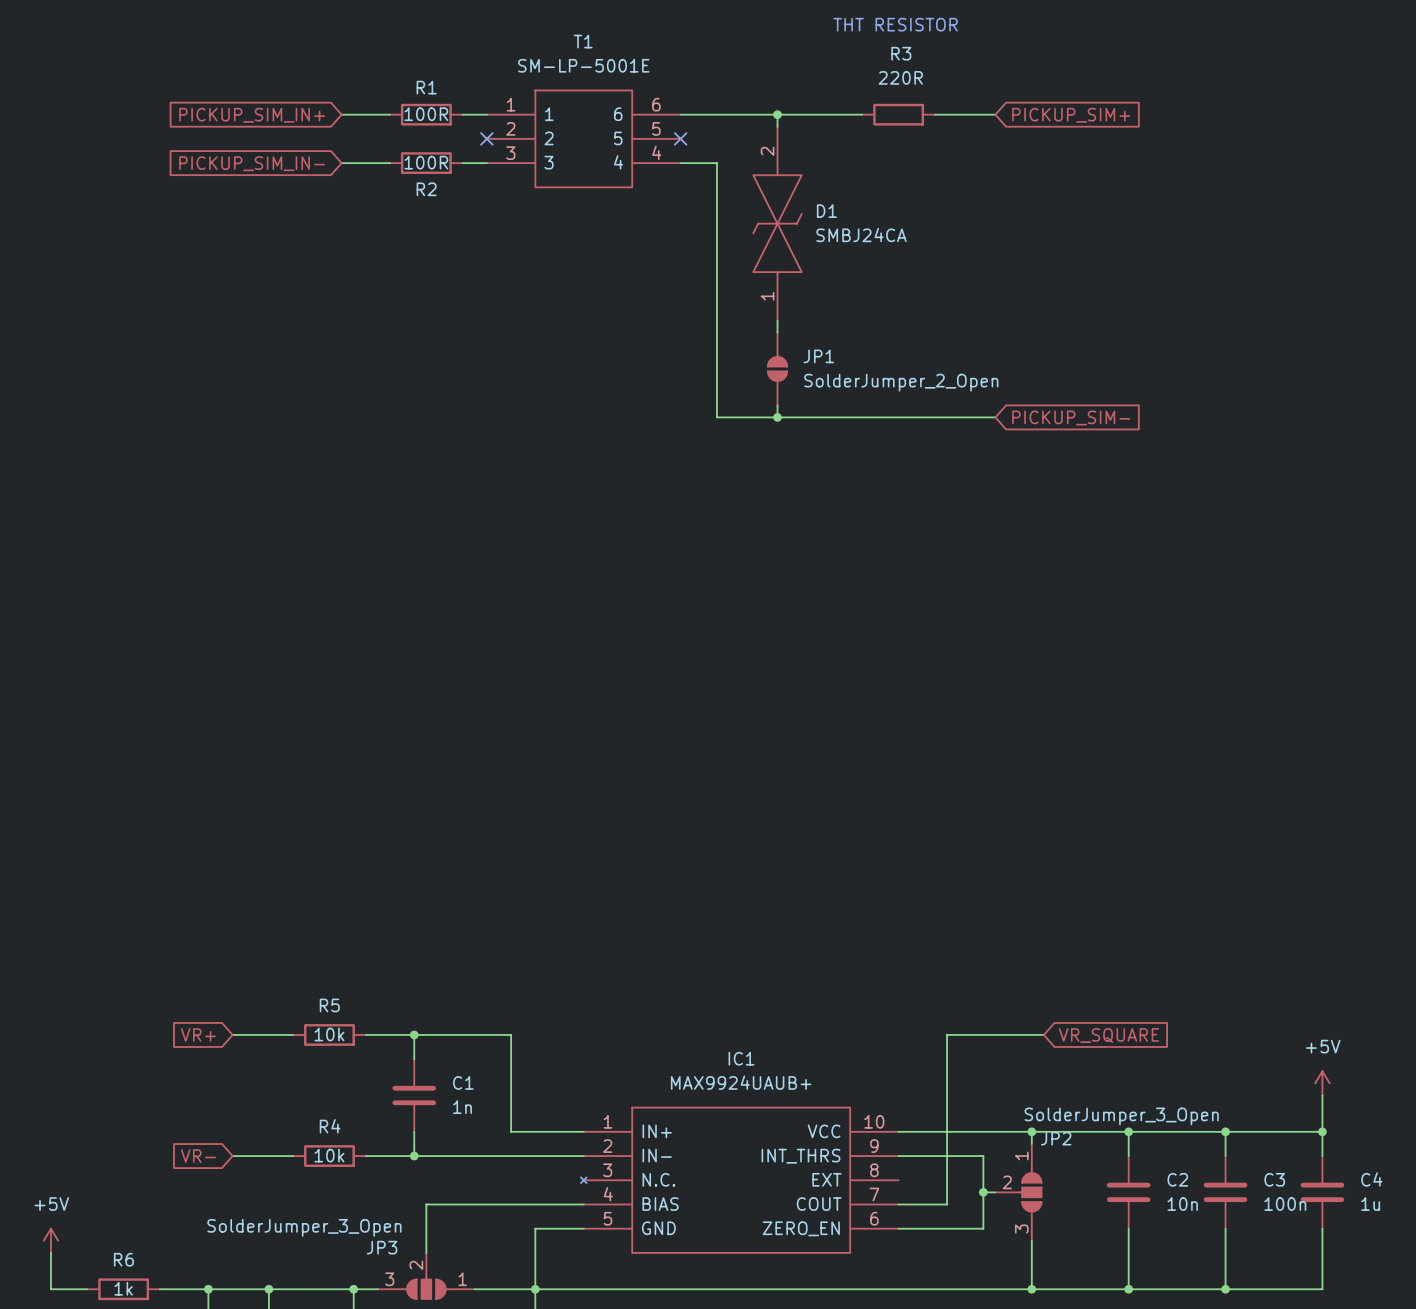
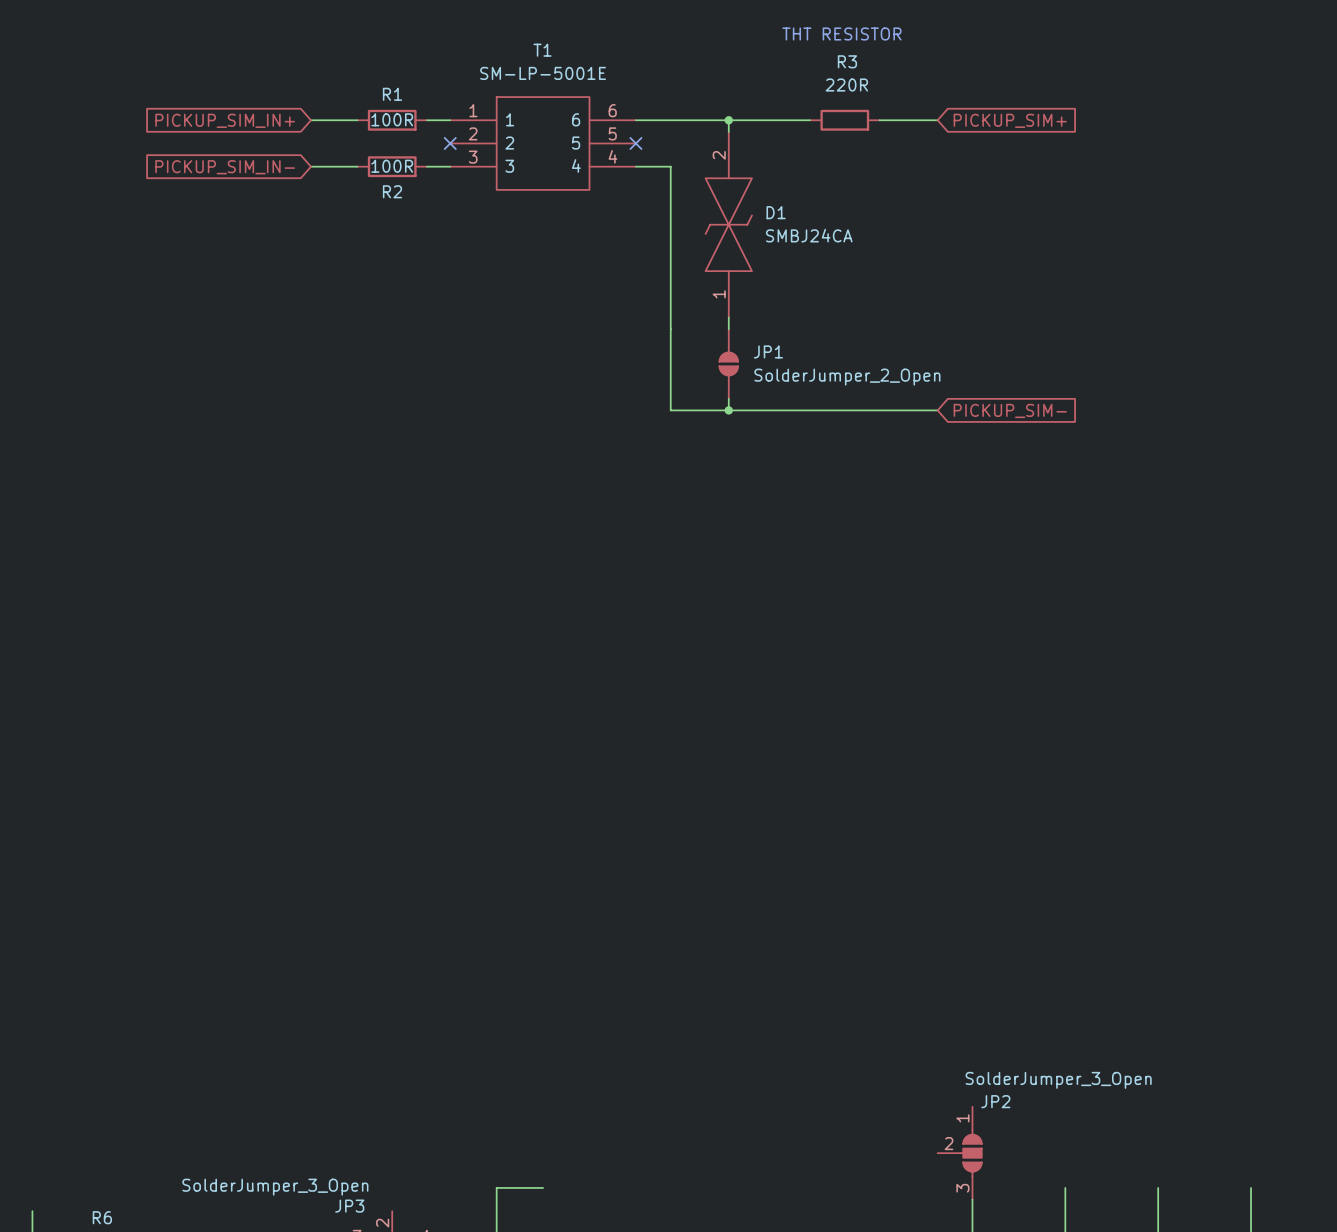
global label: VR+ (198, 1034) -> none
wire: (232, 1034) (293, 1034) -> none
R5: 10k (329, 1034) -> none
wire: (365, 1034) (511, 1034) (511, 1131) (583, 1131) -> none
wire: (414, 1034) (414, 1059) -> none
junction: (414, 1034) -> none
wire: (1043, 1034) (947, 1034) (947, 1204) (898, 1204) -> none
global label: VR_SQUARE (1108, 1035) -> none
power symbol: +5V (1322, 1083) -> none
C1: 1n (414, 1095) -> none
wire: (1322, 1095) (1322, 1156) -> none
wire: (414, 1131) (414, 1156) -> none
wire: (898, 1131) (1322, 1131) -> none
wire: (1031, 1131) (1031, 1143) -> none
junction: (1031, 1131) -> none
wire: (1128, 1131) (1128, 1156) -> none
junction: (1128, 1131) -> none
wire: (1225, 1131) (1225, 1156) -> none
junction: (1225, 1131) -> none
junction: (1322, 1131) -> none
global label: VR- (198, 1156) -> none
wire: (232, 1156) (293, 1156) -> none
R4: 10k (329, 1156) -> none
wire: (365, 1156) (583, 1156) -> none
junction: (414, 1156) -> none
wire: (898, 1156) (983, 1156) (983, 1228) (898, 1228) -> none
IC1: MAX9924UAUB+ (739, 1180) -> none
wire: (983, 1192) (995, 1192) -> none
junction: (983, 1192) -> none
C2: 10n (1128, 1192) -> none
C3: 100n (1225, 1192) -> none
C4: 1u (1322, 1192) -> none
wire: (583, 1204) (426, 1204) (426, 1252) -> none
power symbol: +5V (50, 1240) -> none

